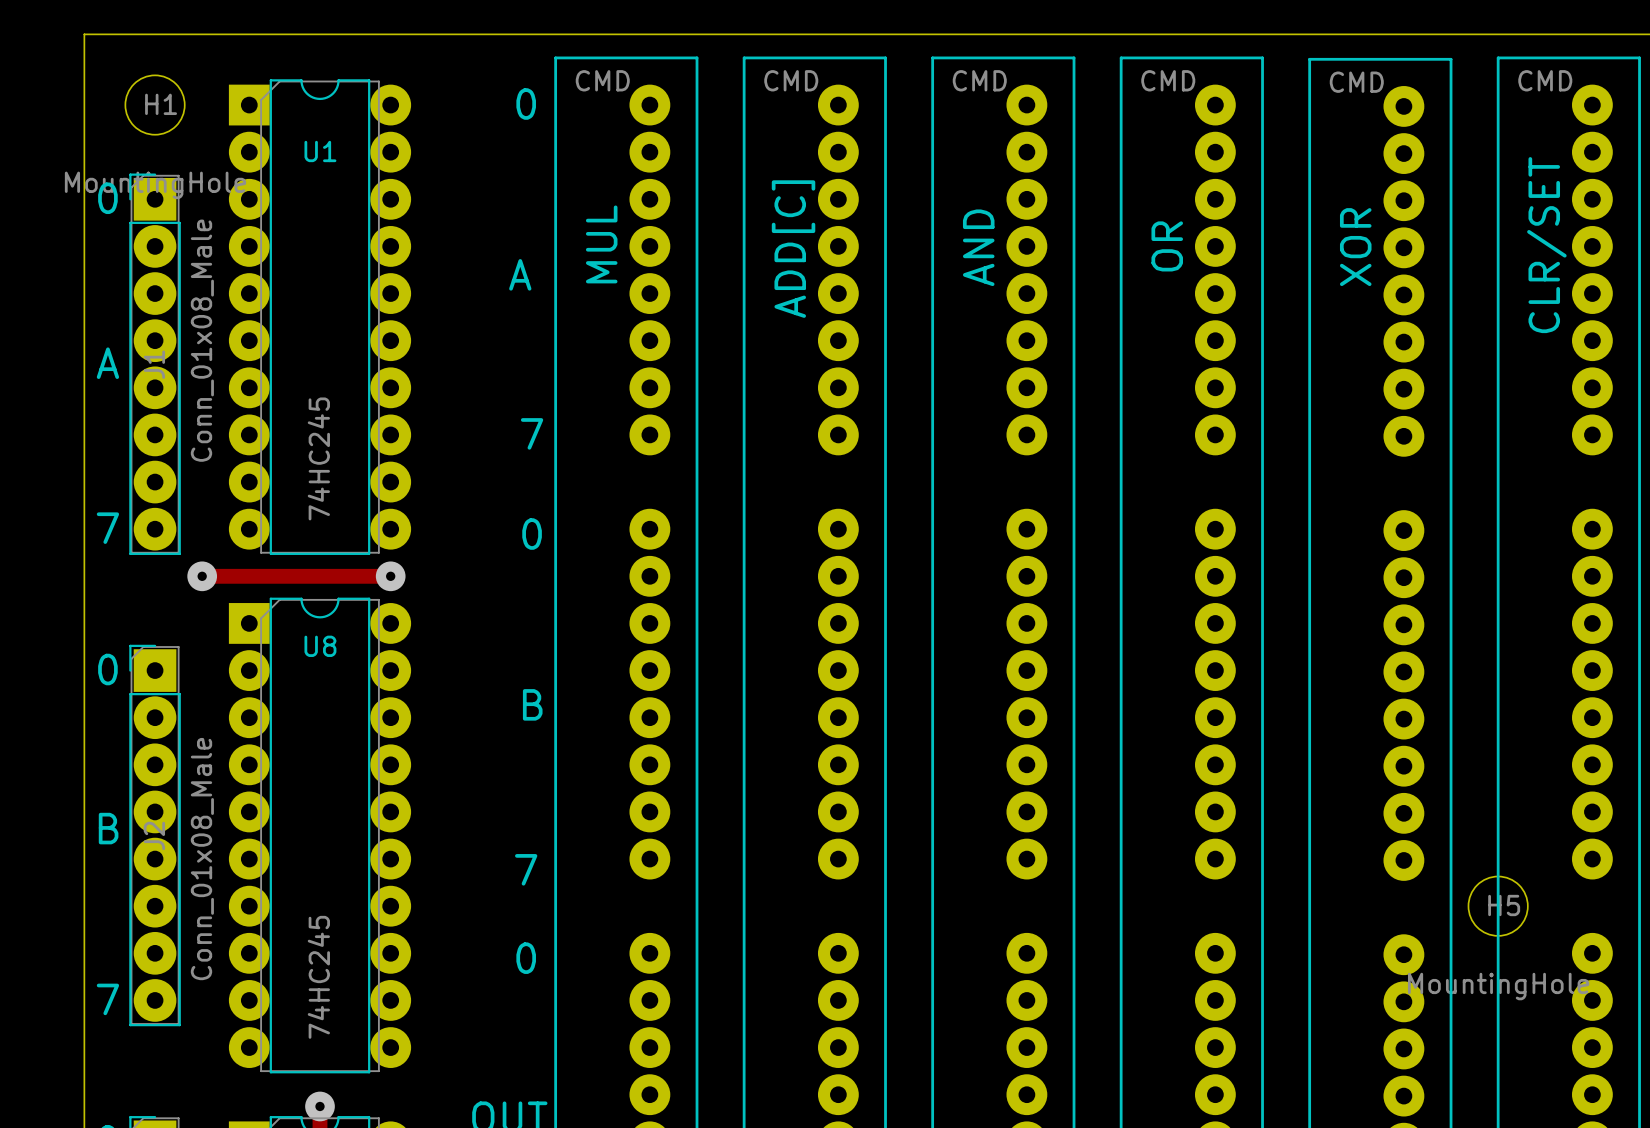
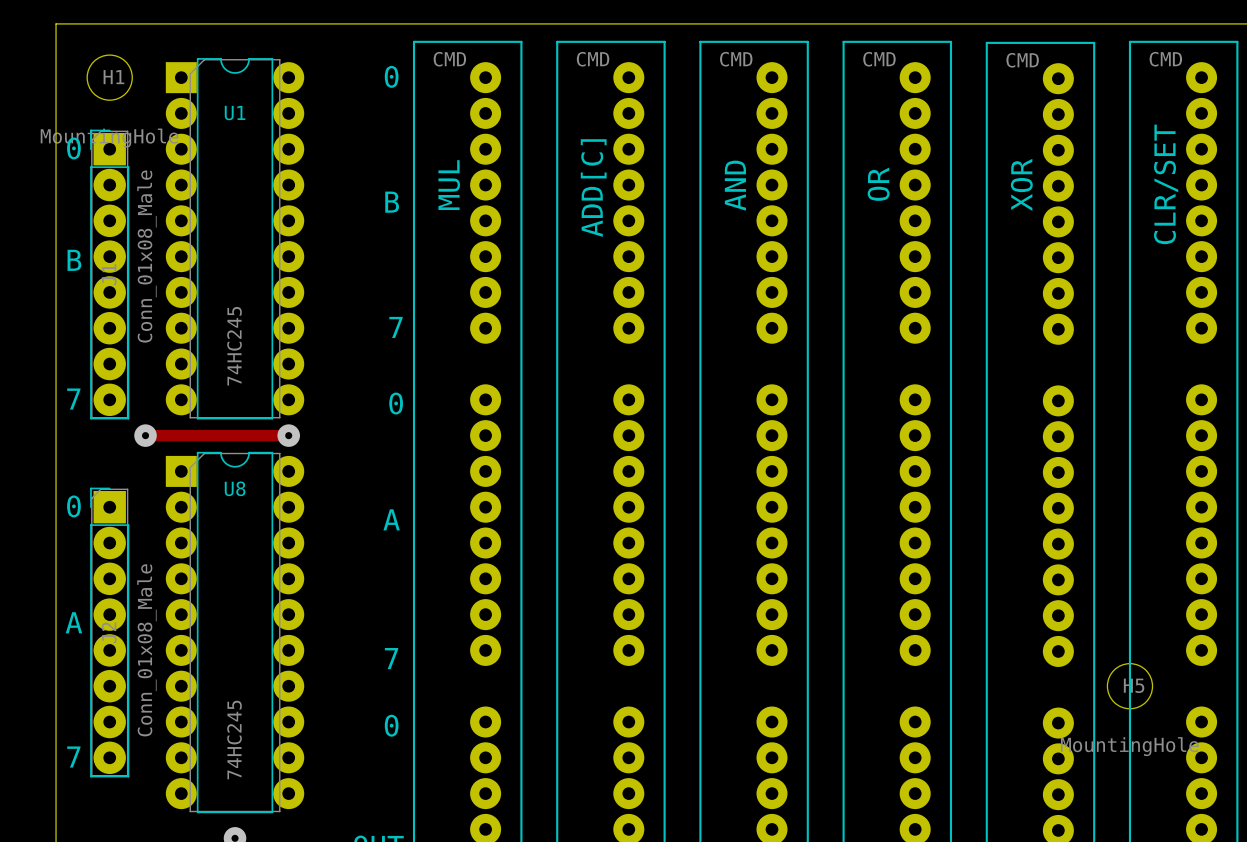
text: A (520, 274) -> B (392, 202)
text: A (107, 363) -> B (74, 260)
text: none -> A (391, 519)
text: B (532, 704) -> none
text: B (108, 828) -> A (73, 622)

